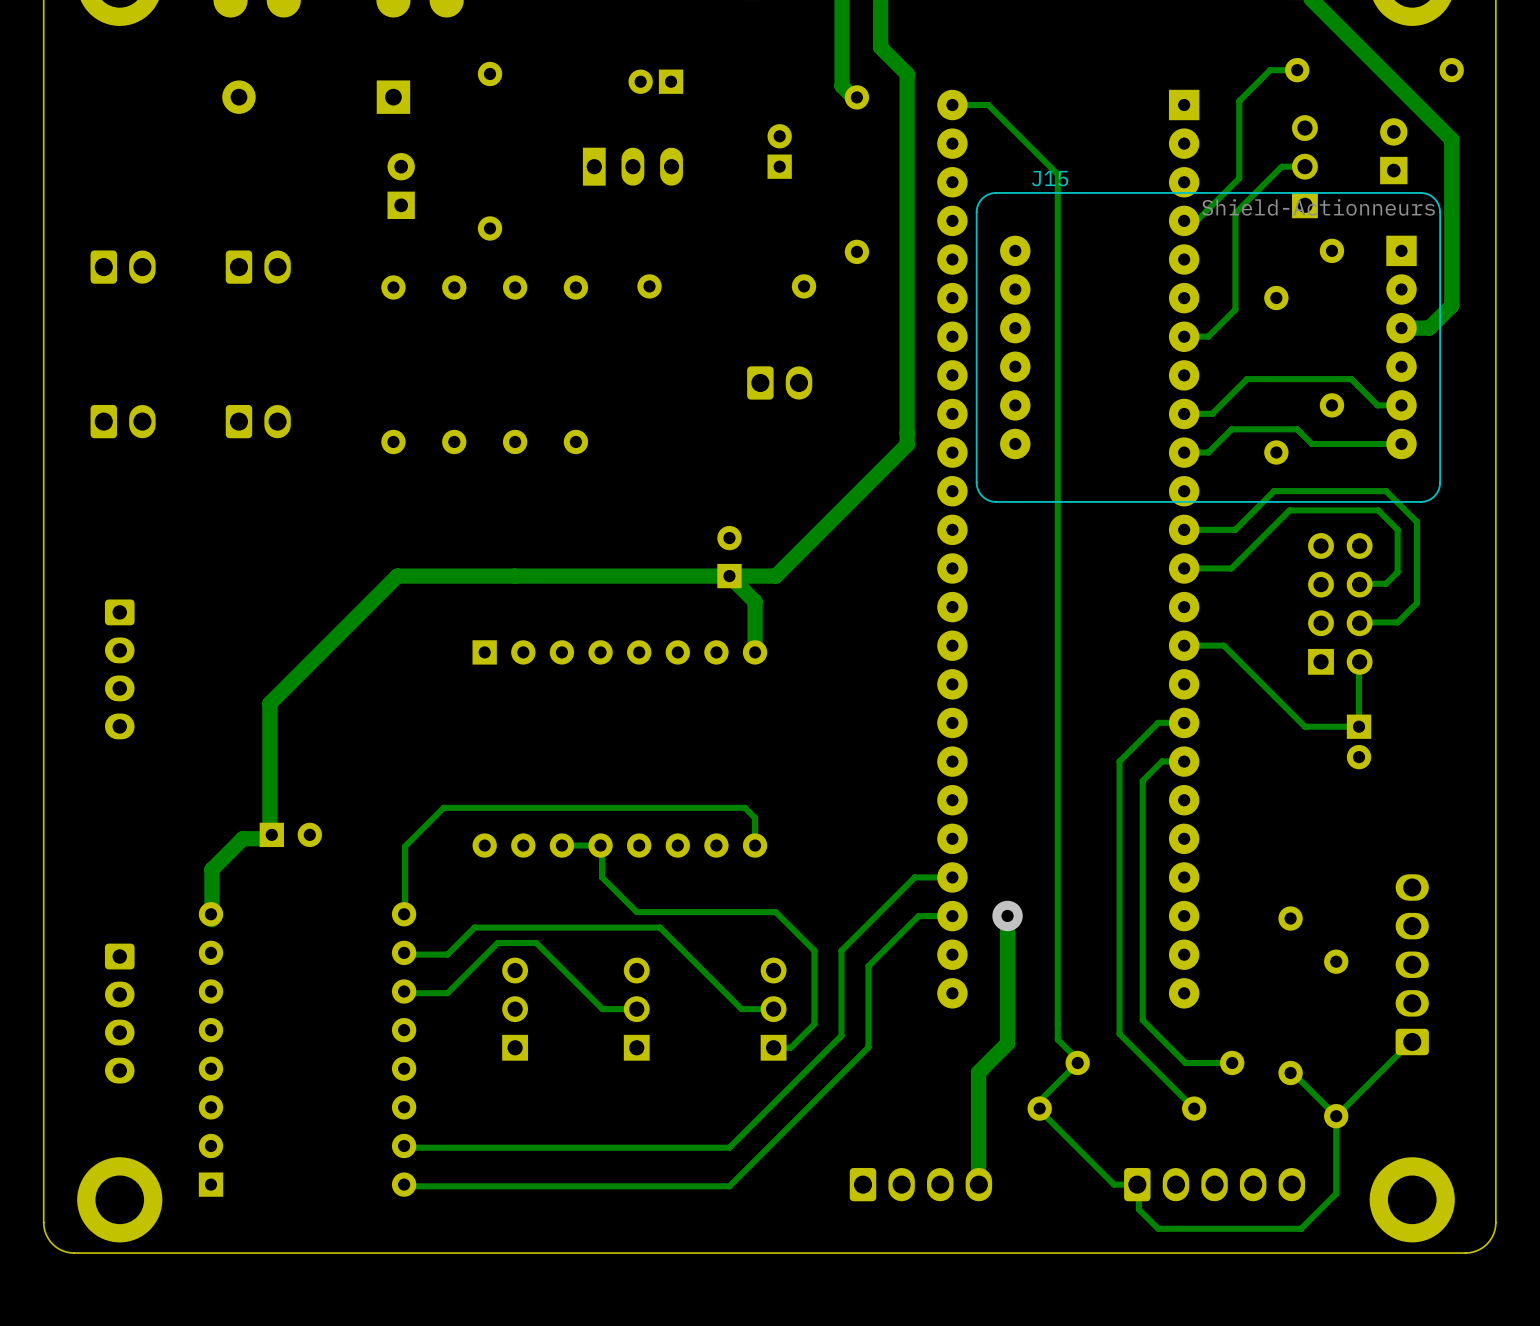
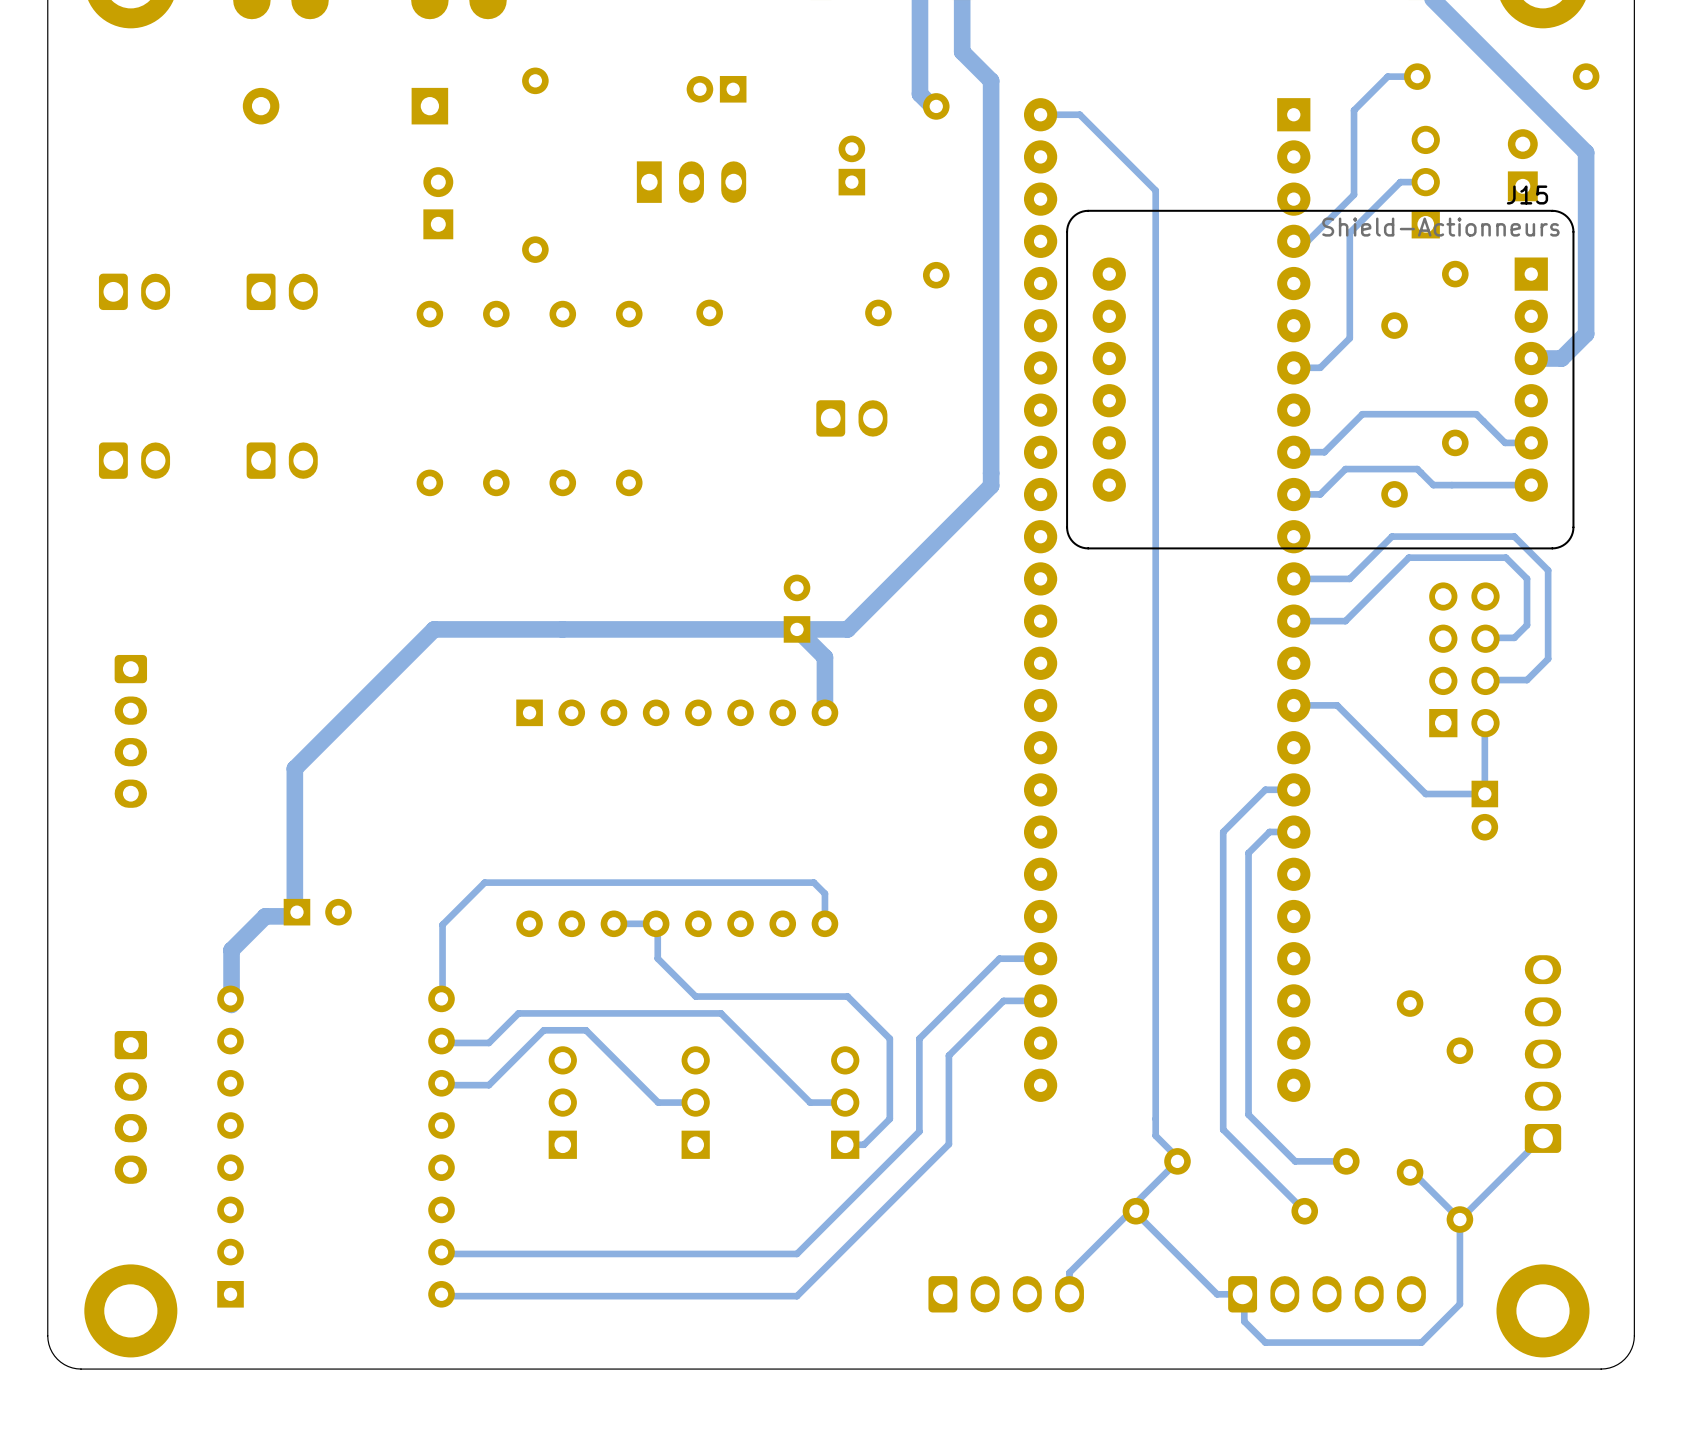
J15 name position: J15 (1050, 178) -> J15 (1527, 195)
track: (1007, 915) (1007, 1043) (978, 1072) (978, 1188) -> none
via: (1007, 915) -> none
track: none -> (1134, 1207) (1069, 1272) (1069, 1294)

